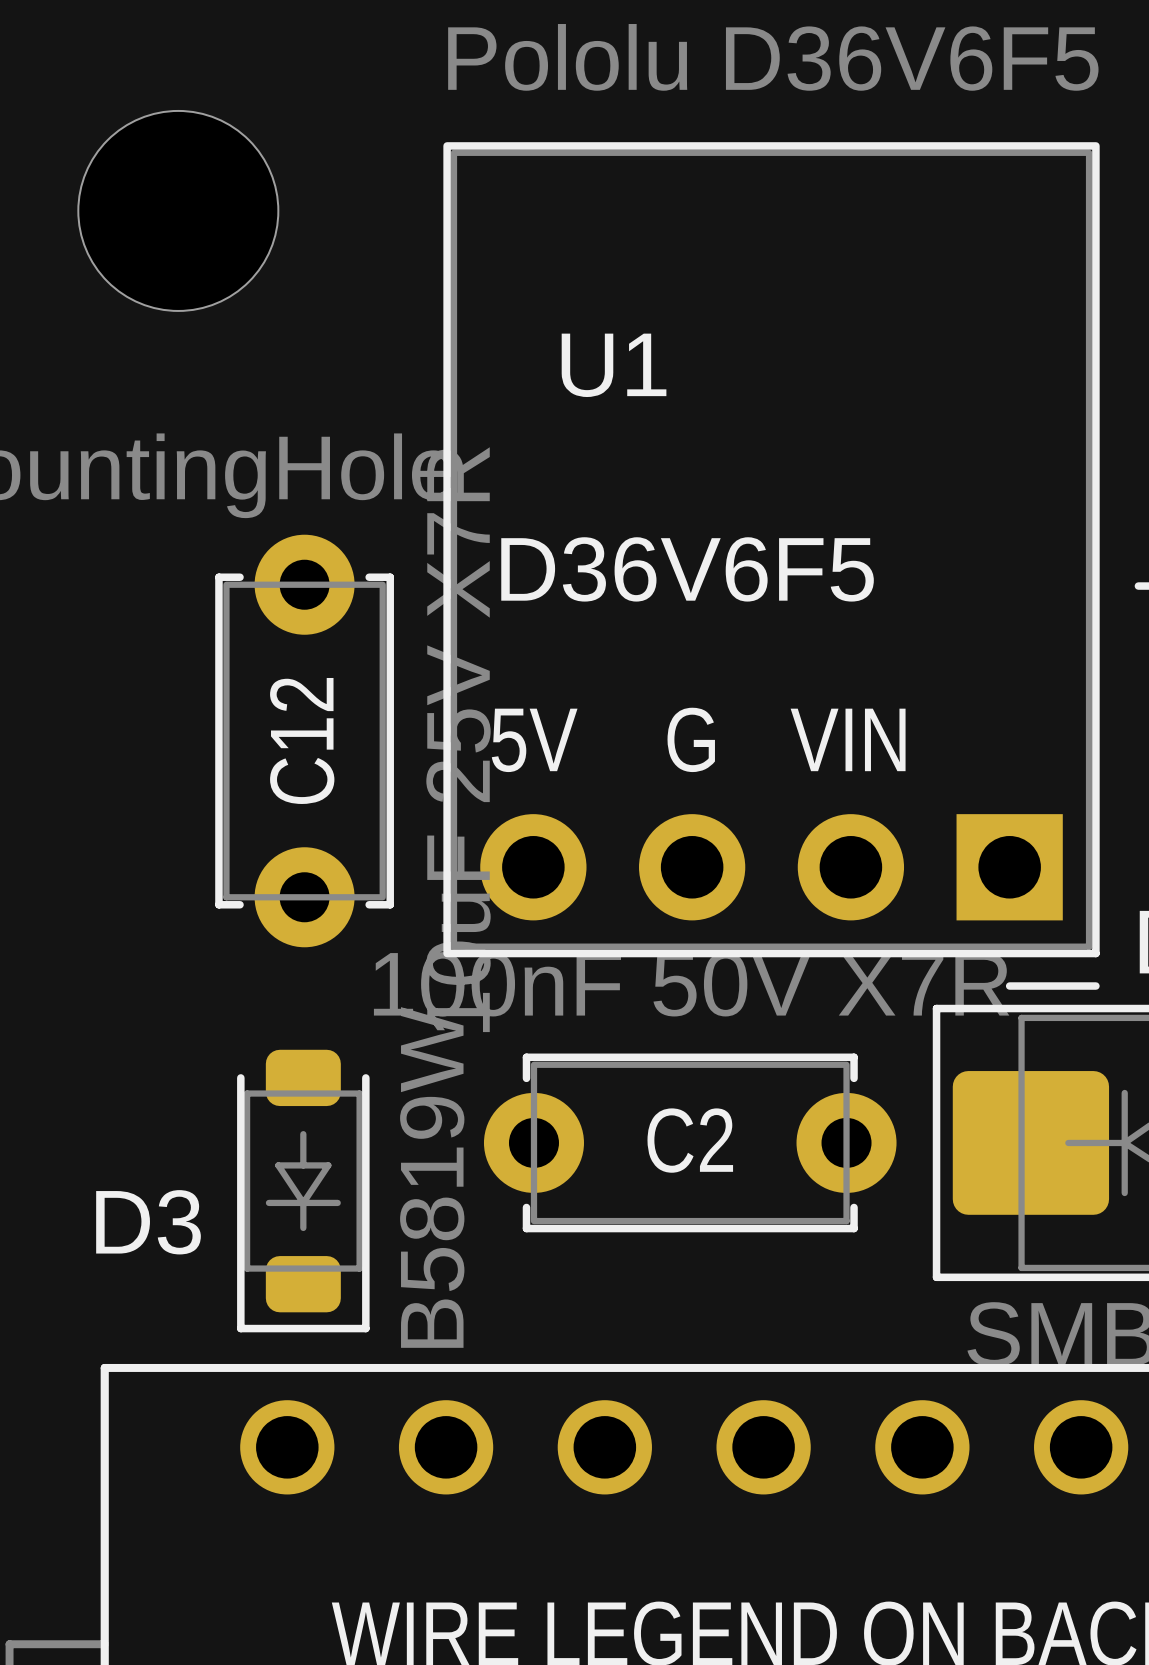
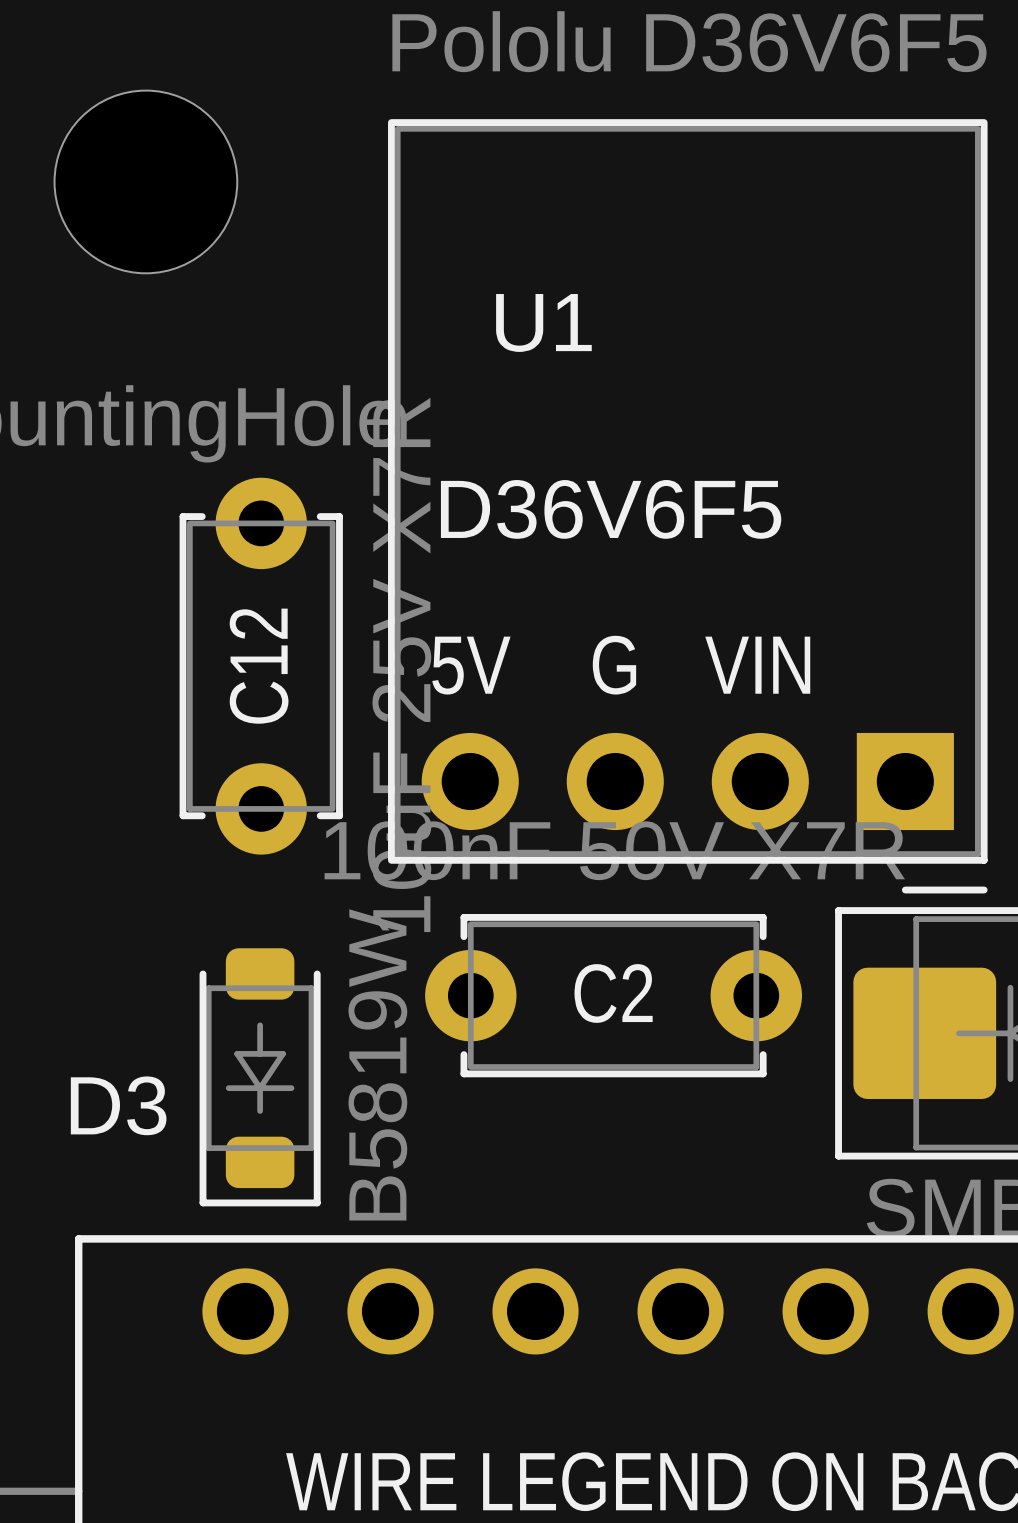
C2 position: (690, 1142) -> (613, 995)

